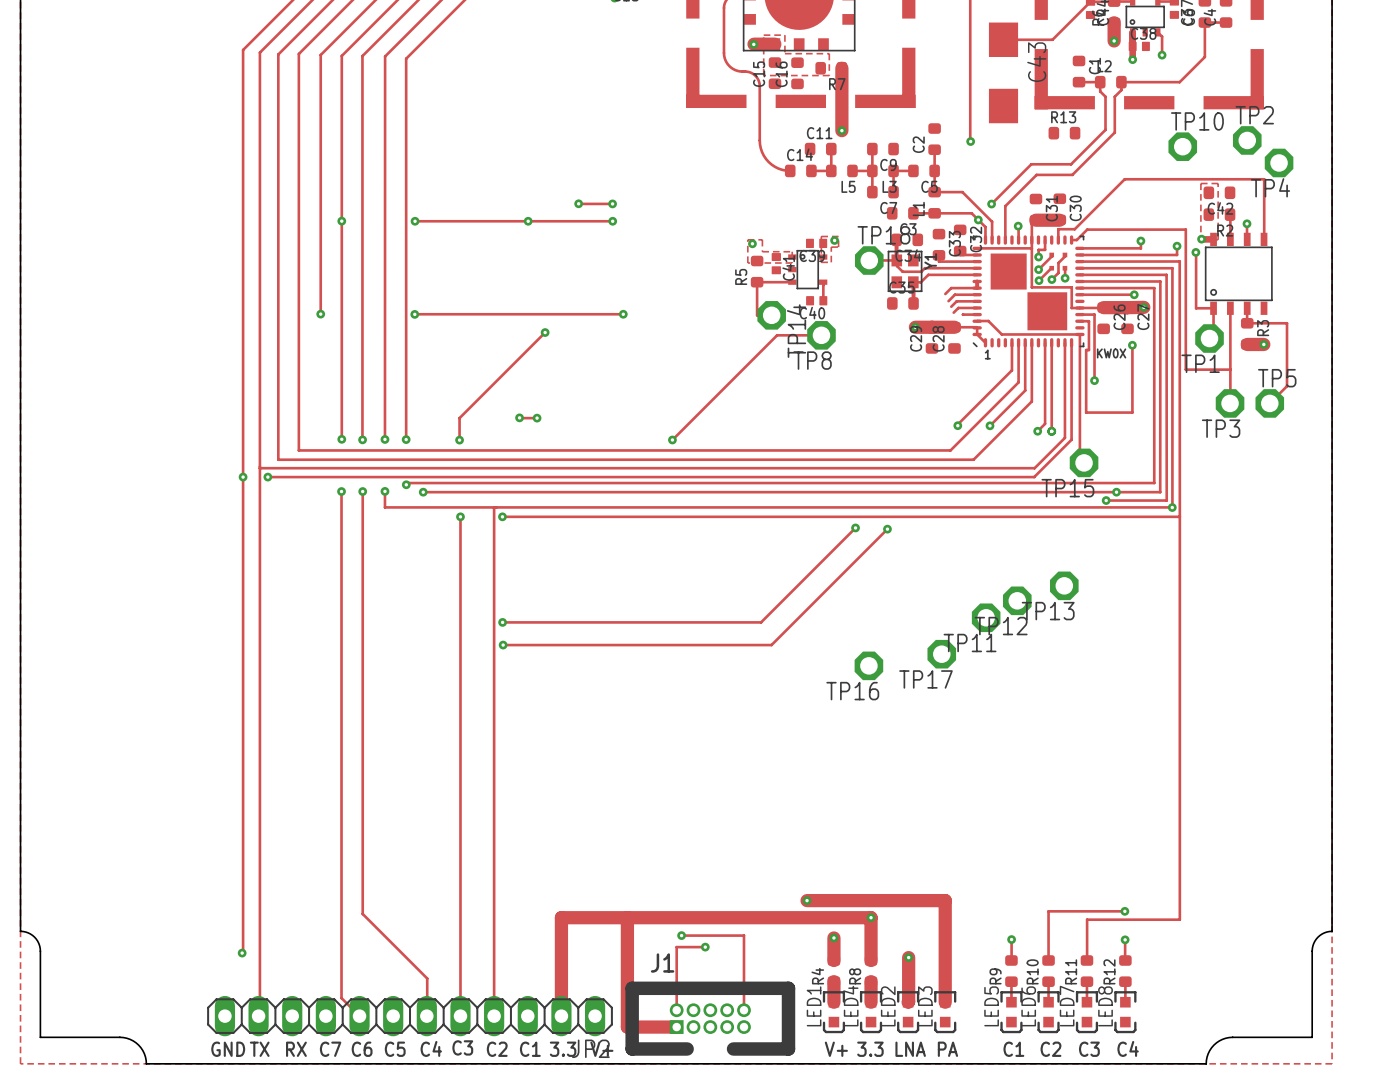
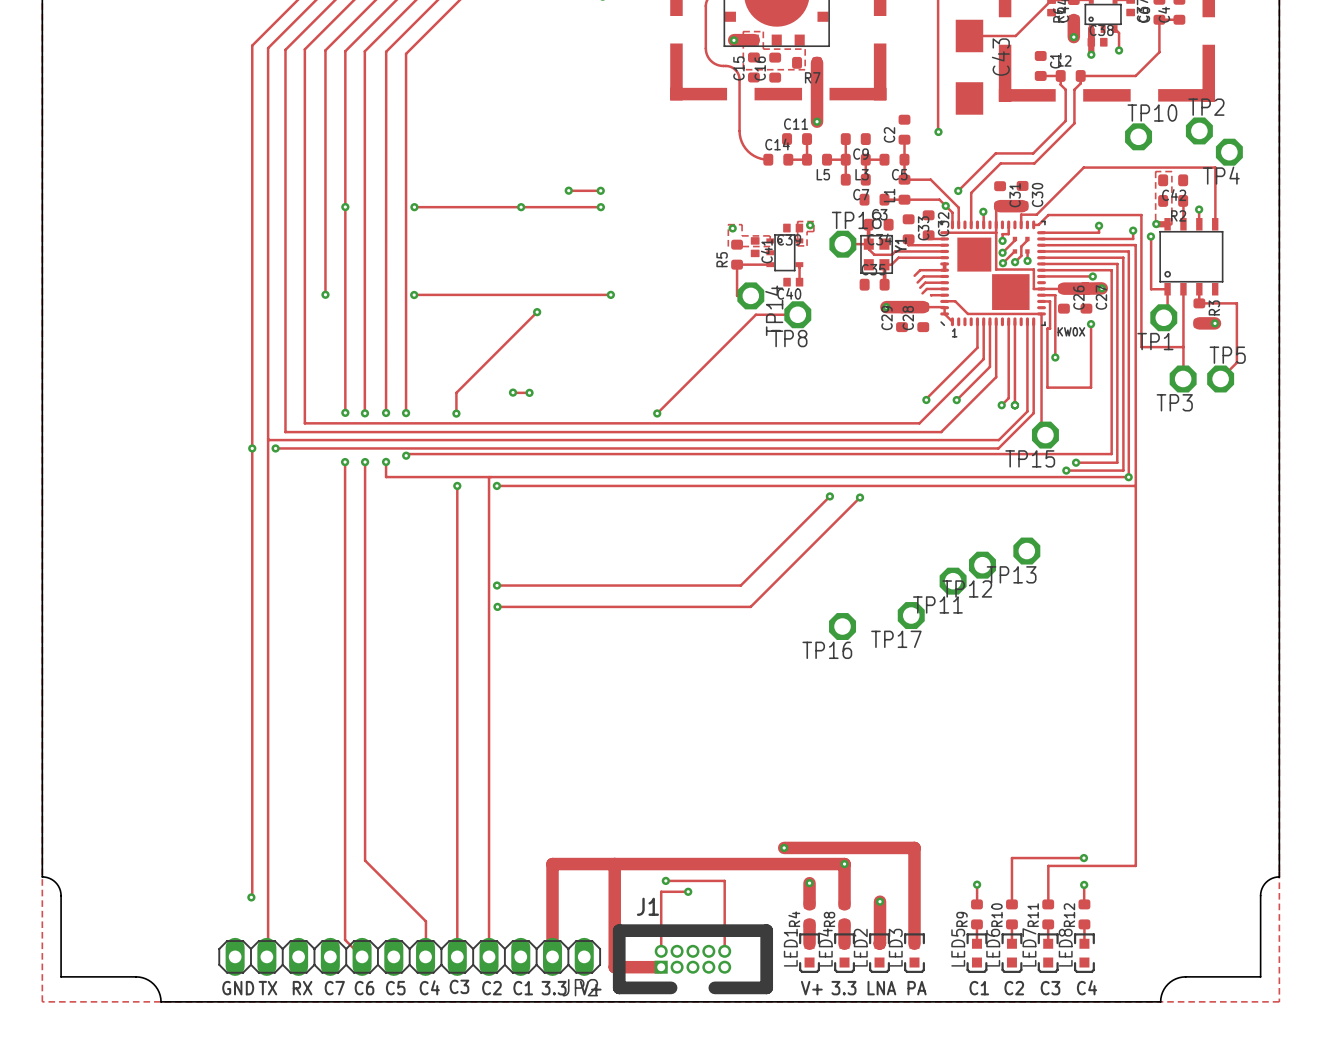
R13: (1064, 133) -> none
track: (423, 492) (1116, 492) -> none
via: (423, 492) -> none

